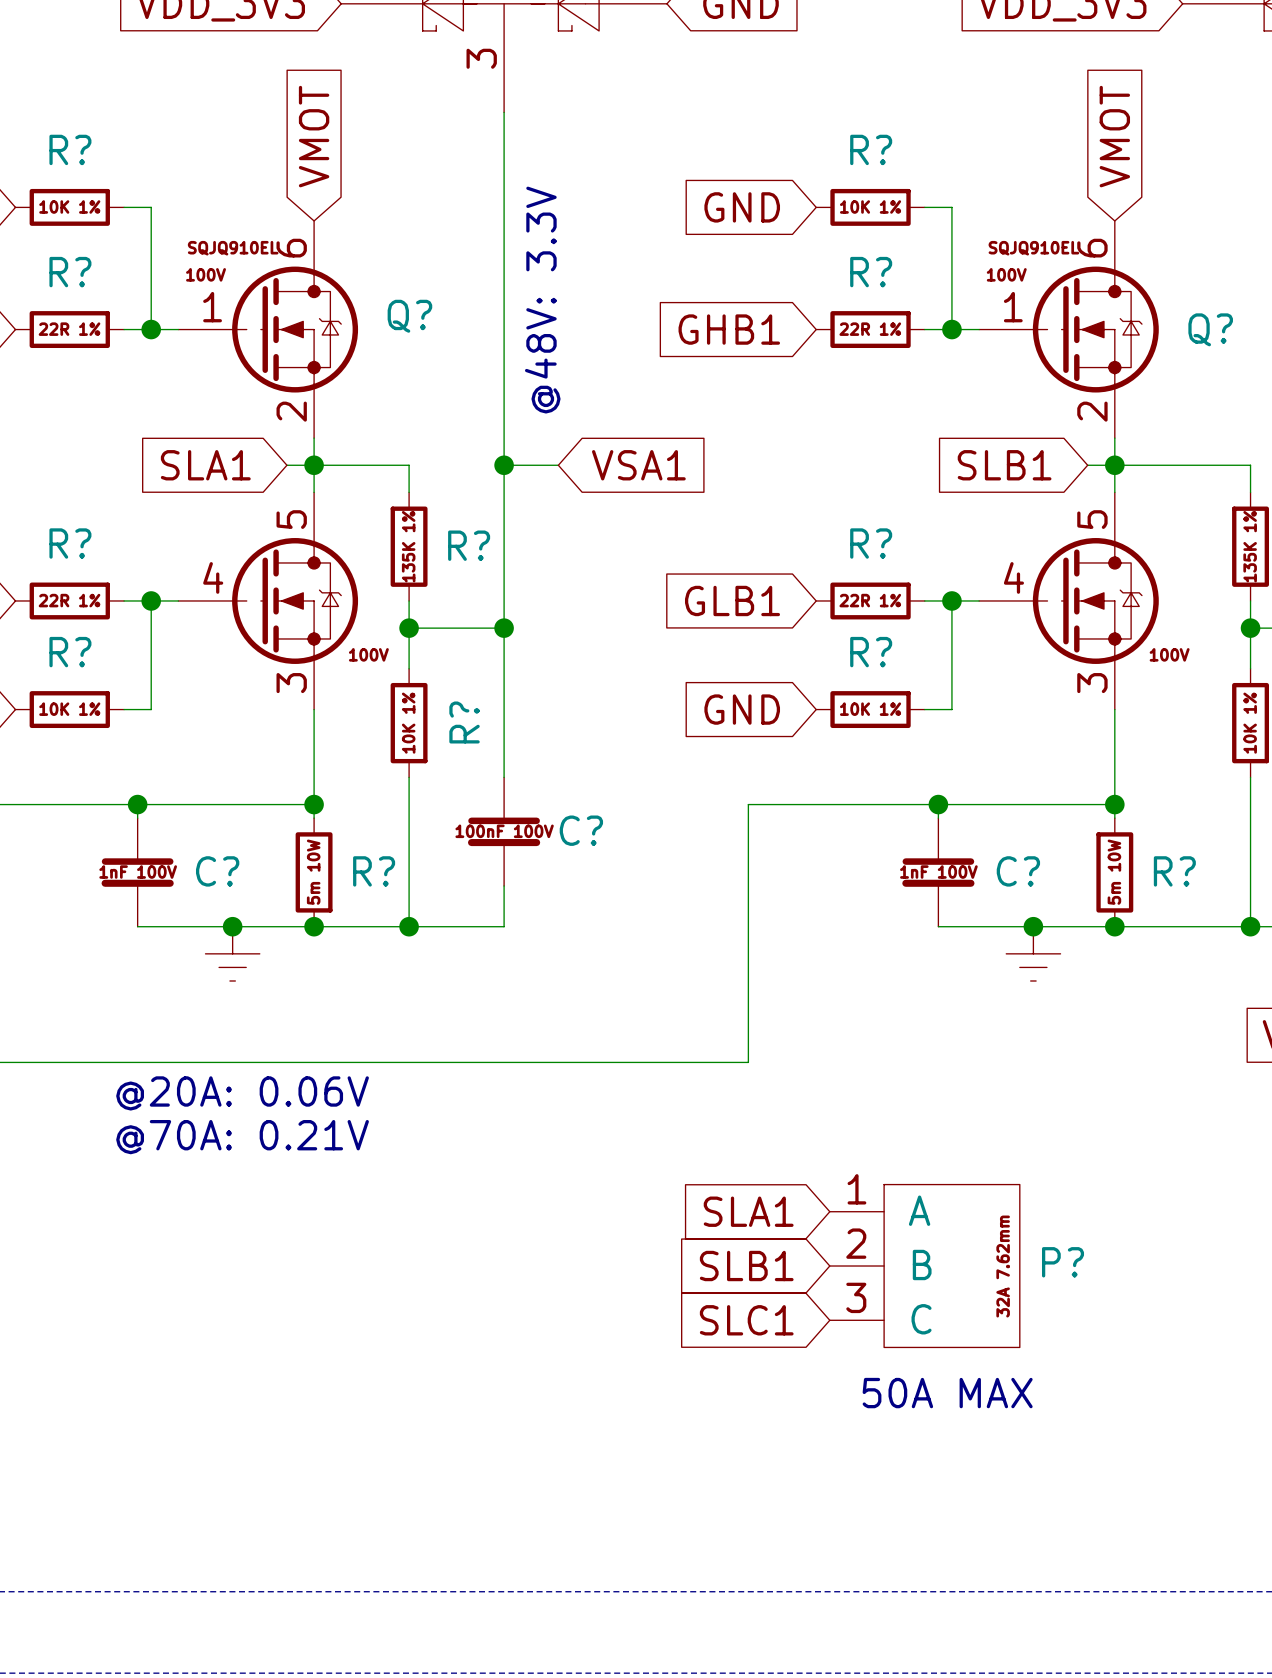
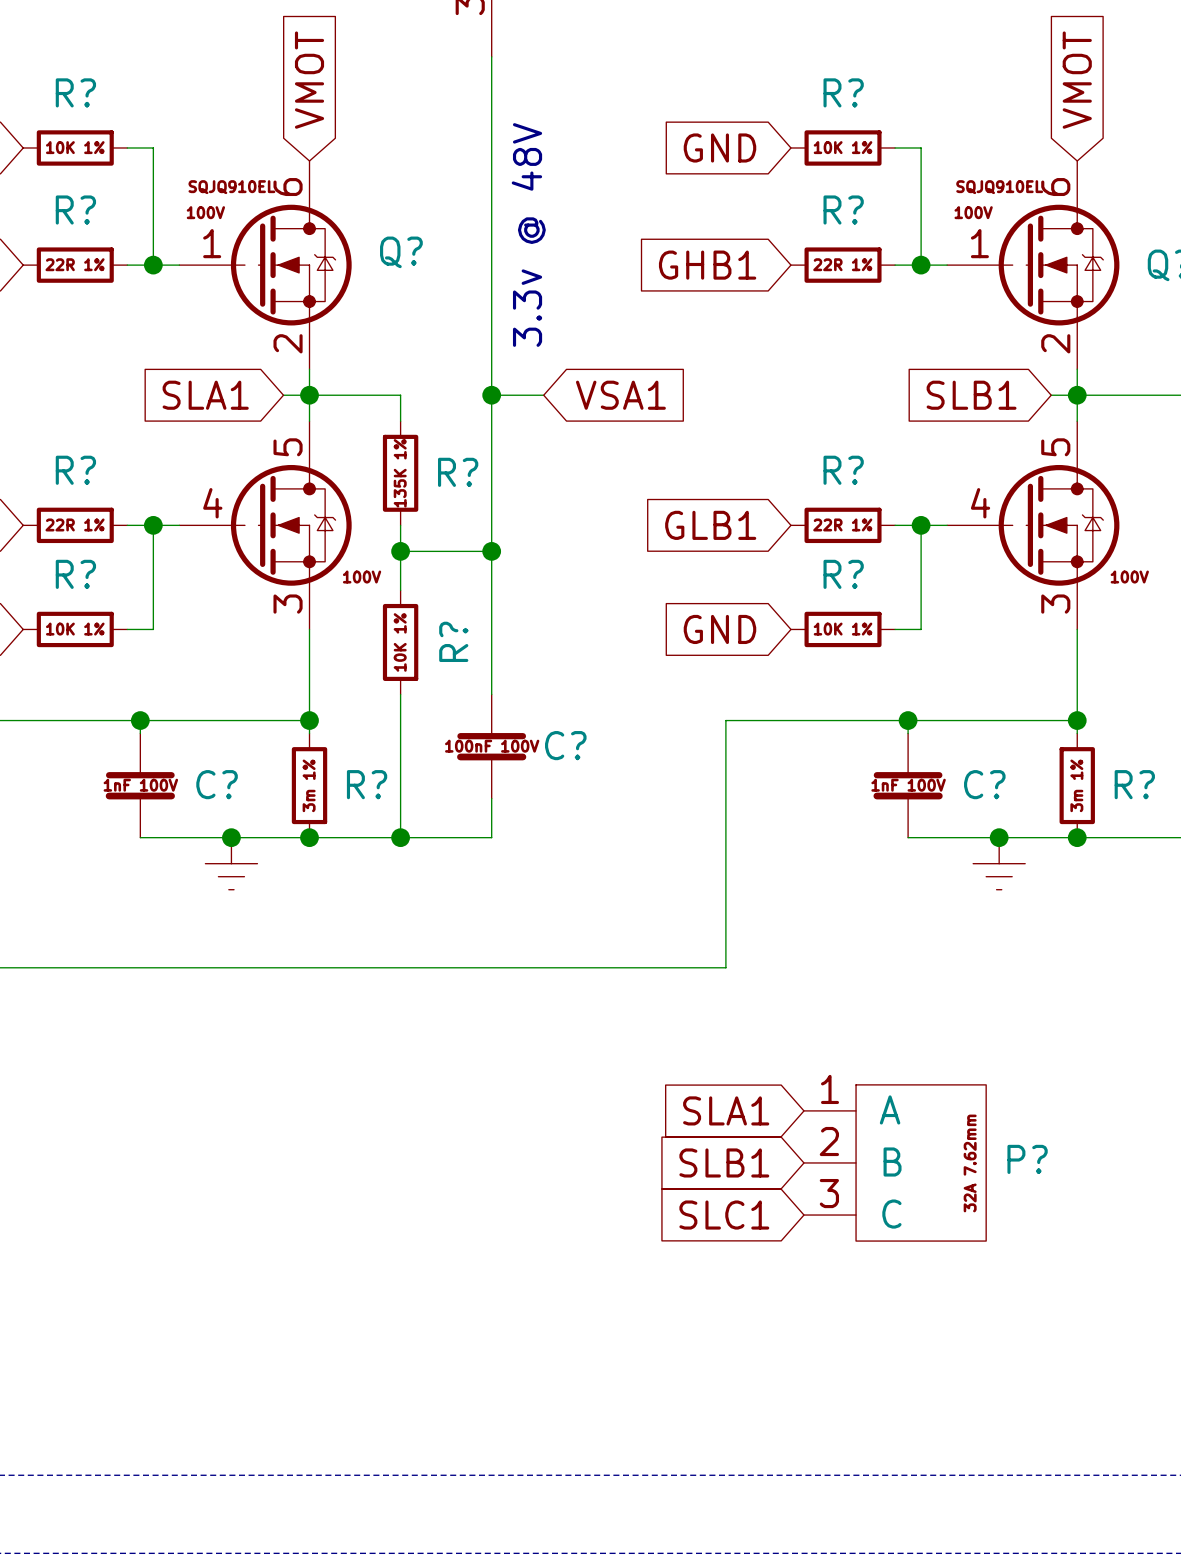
text: @48V: 3.3V (542, 300) -> 3.3v @ 48V (528, 235)
R? text: 5m 10W (313, 872) -> 3m 1% (309, 785)
R? text: 5m 10W (1114, 872) -> 3m 1% (1076, 785)
text: @20A: 0.06V (242, 1093) -> none
text: @70A: 0.21V (242, 1137) -> none
text: 50A MAX (947, 1393) -> none

